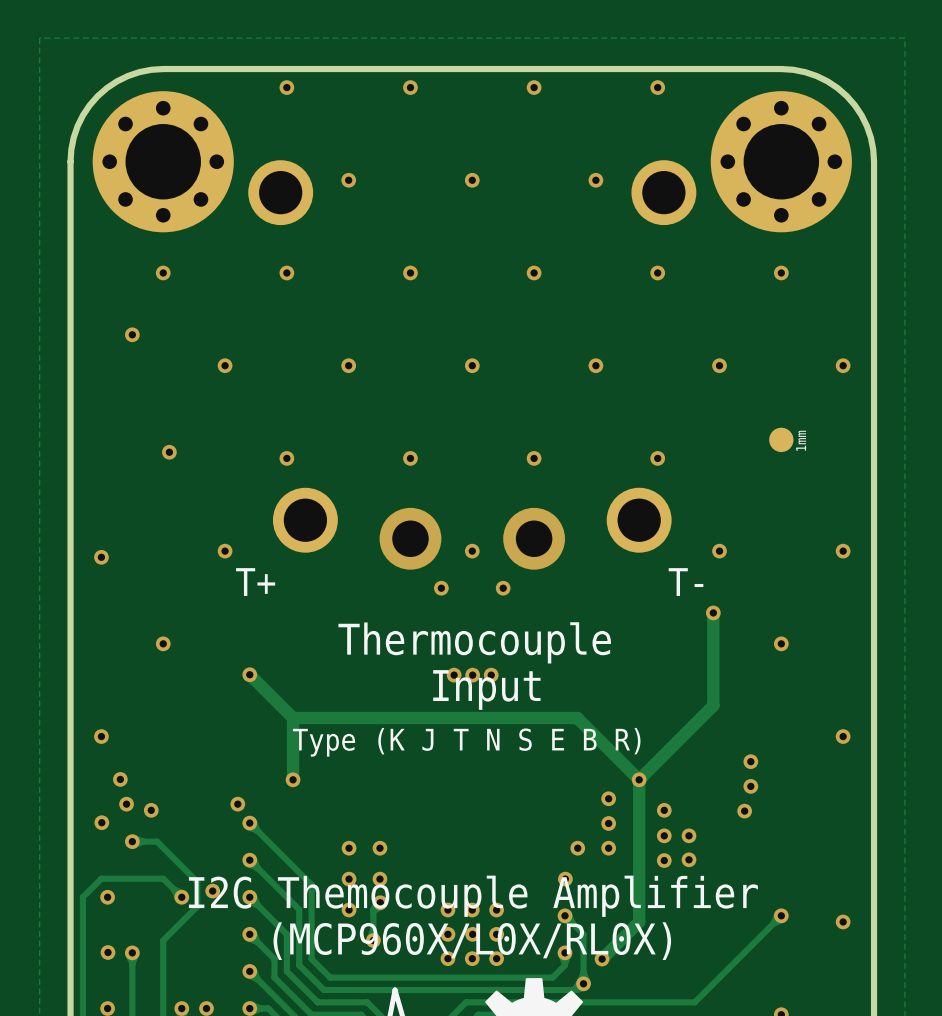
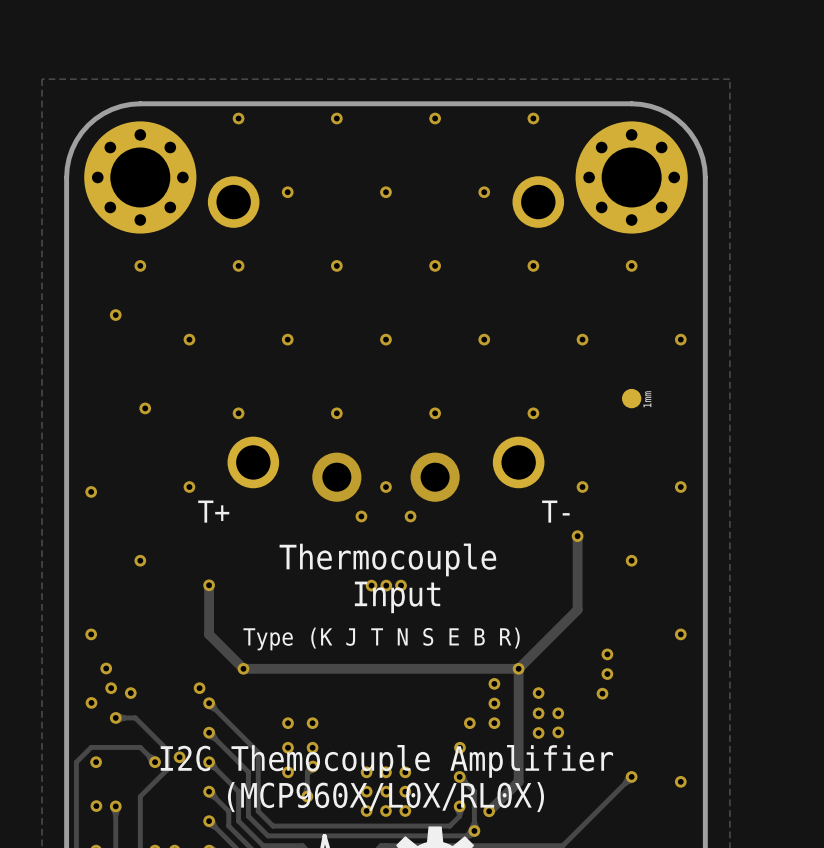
track: (249, 674) (293, 718) -> none
track: (293, 718) (577, 718) (639, 779) -> (209, 585) (209, 634) (243, 668) (518, 668)
track: (293, 718) (293, 779) -> none

